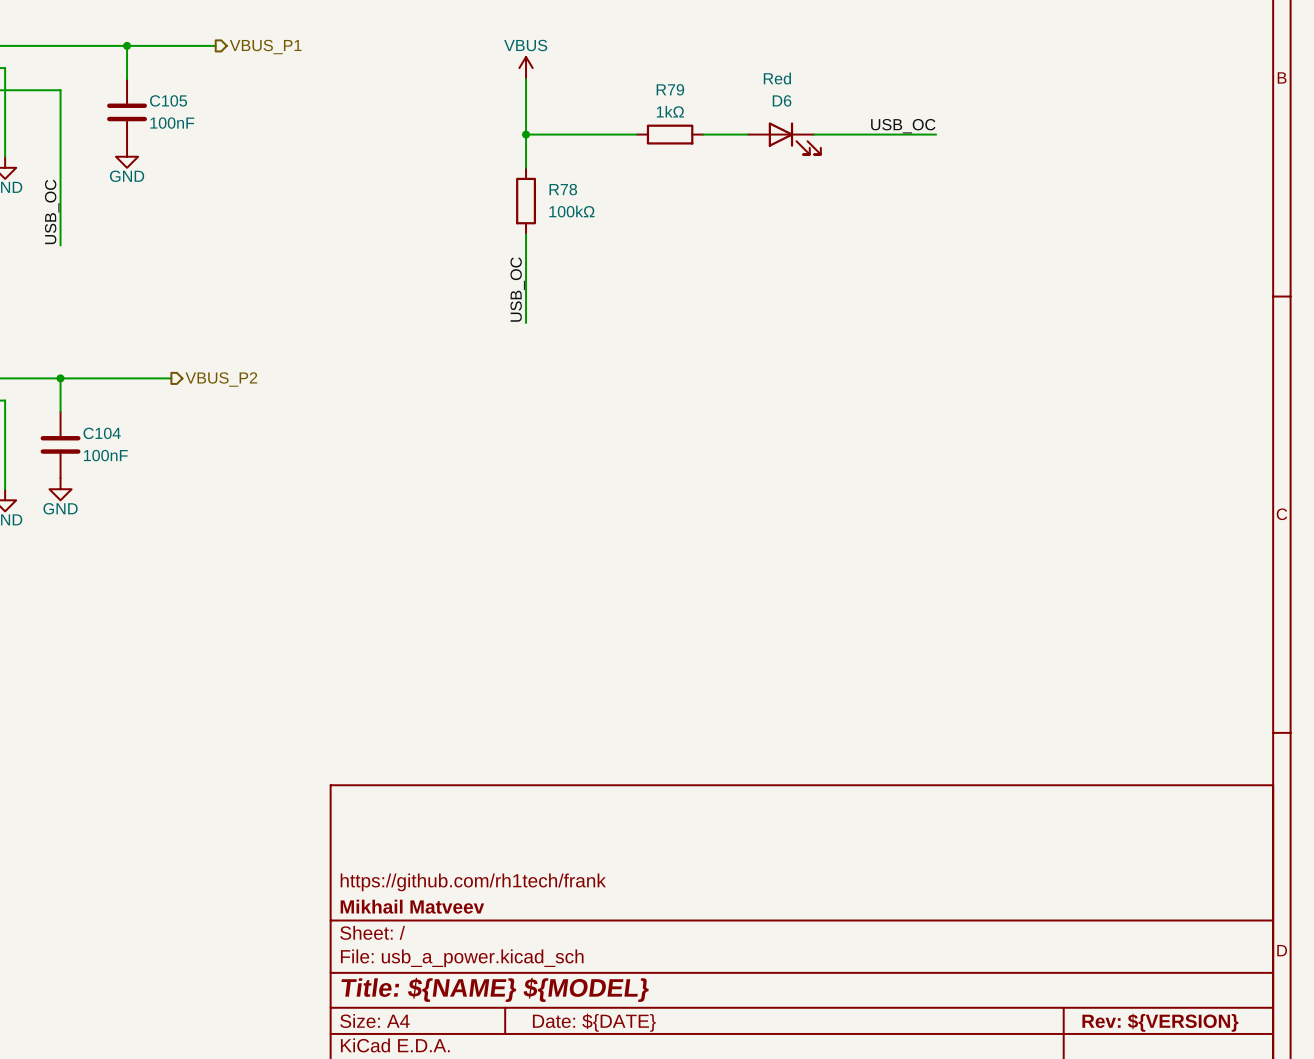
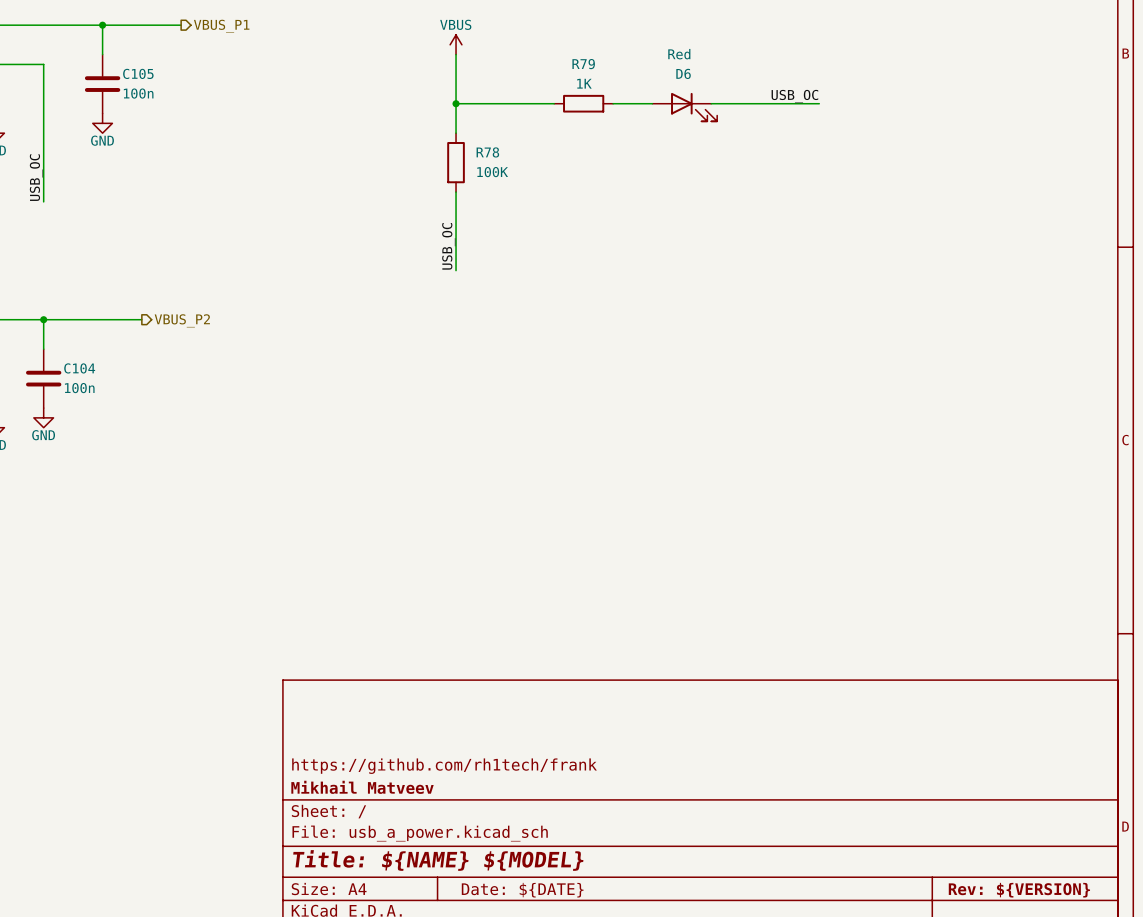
R79 value: 1kΩ (670, 111) -> 1K (584, 83)
C105 value: 100nF (172, 123) -> 100n (138, 93)
R78 value: 100kΩ (571, 211) -> 100K (492, 172)
C104 value: 100nF (105, 455) -> 100n (79, 388)

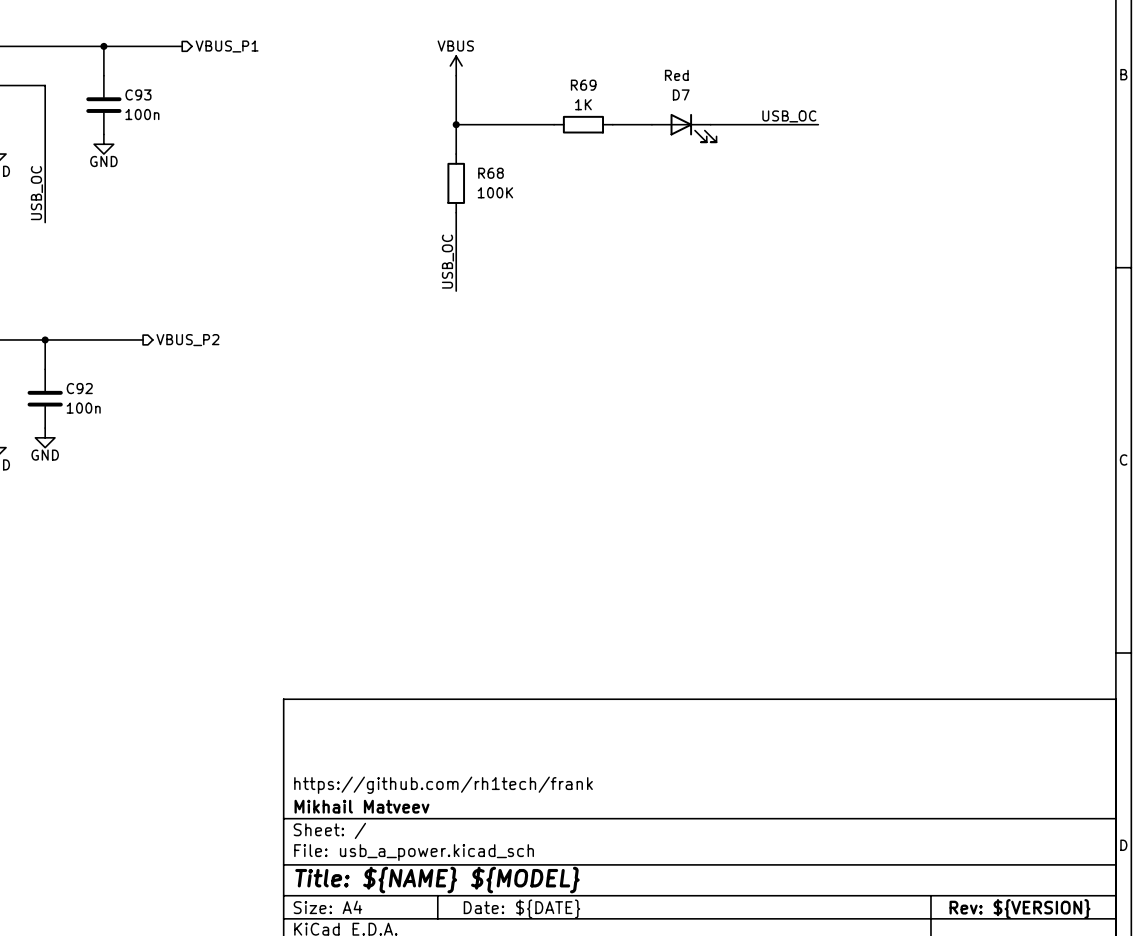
R79 name: R79 (583, 64) -> R69 (583, 85)
C105 name: C105 (138, 73) -> C93 (138, 94)
D6 name: D6 (683, 73) -> D7 (681, 94)
R78 name: R78 (487, 152) -> R68 (491, 173)
C104 name: C104 (79, 368) -> C92 (79, 388)

